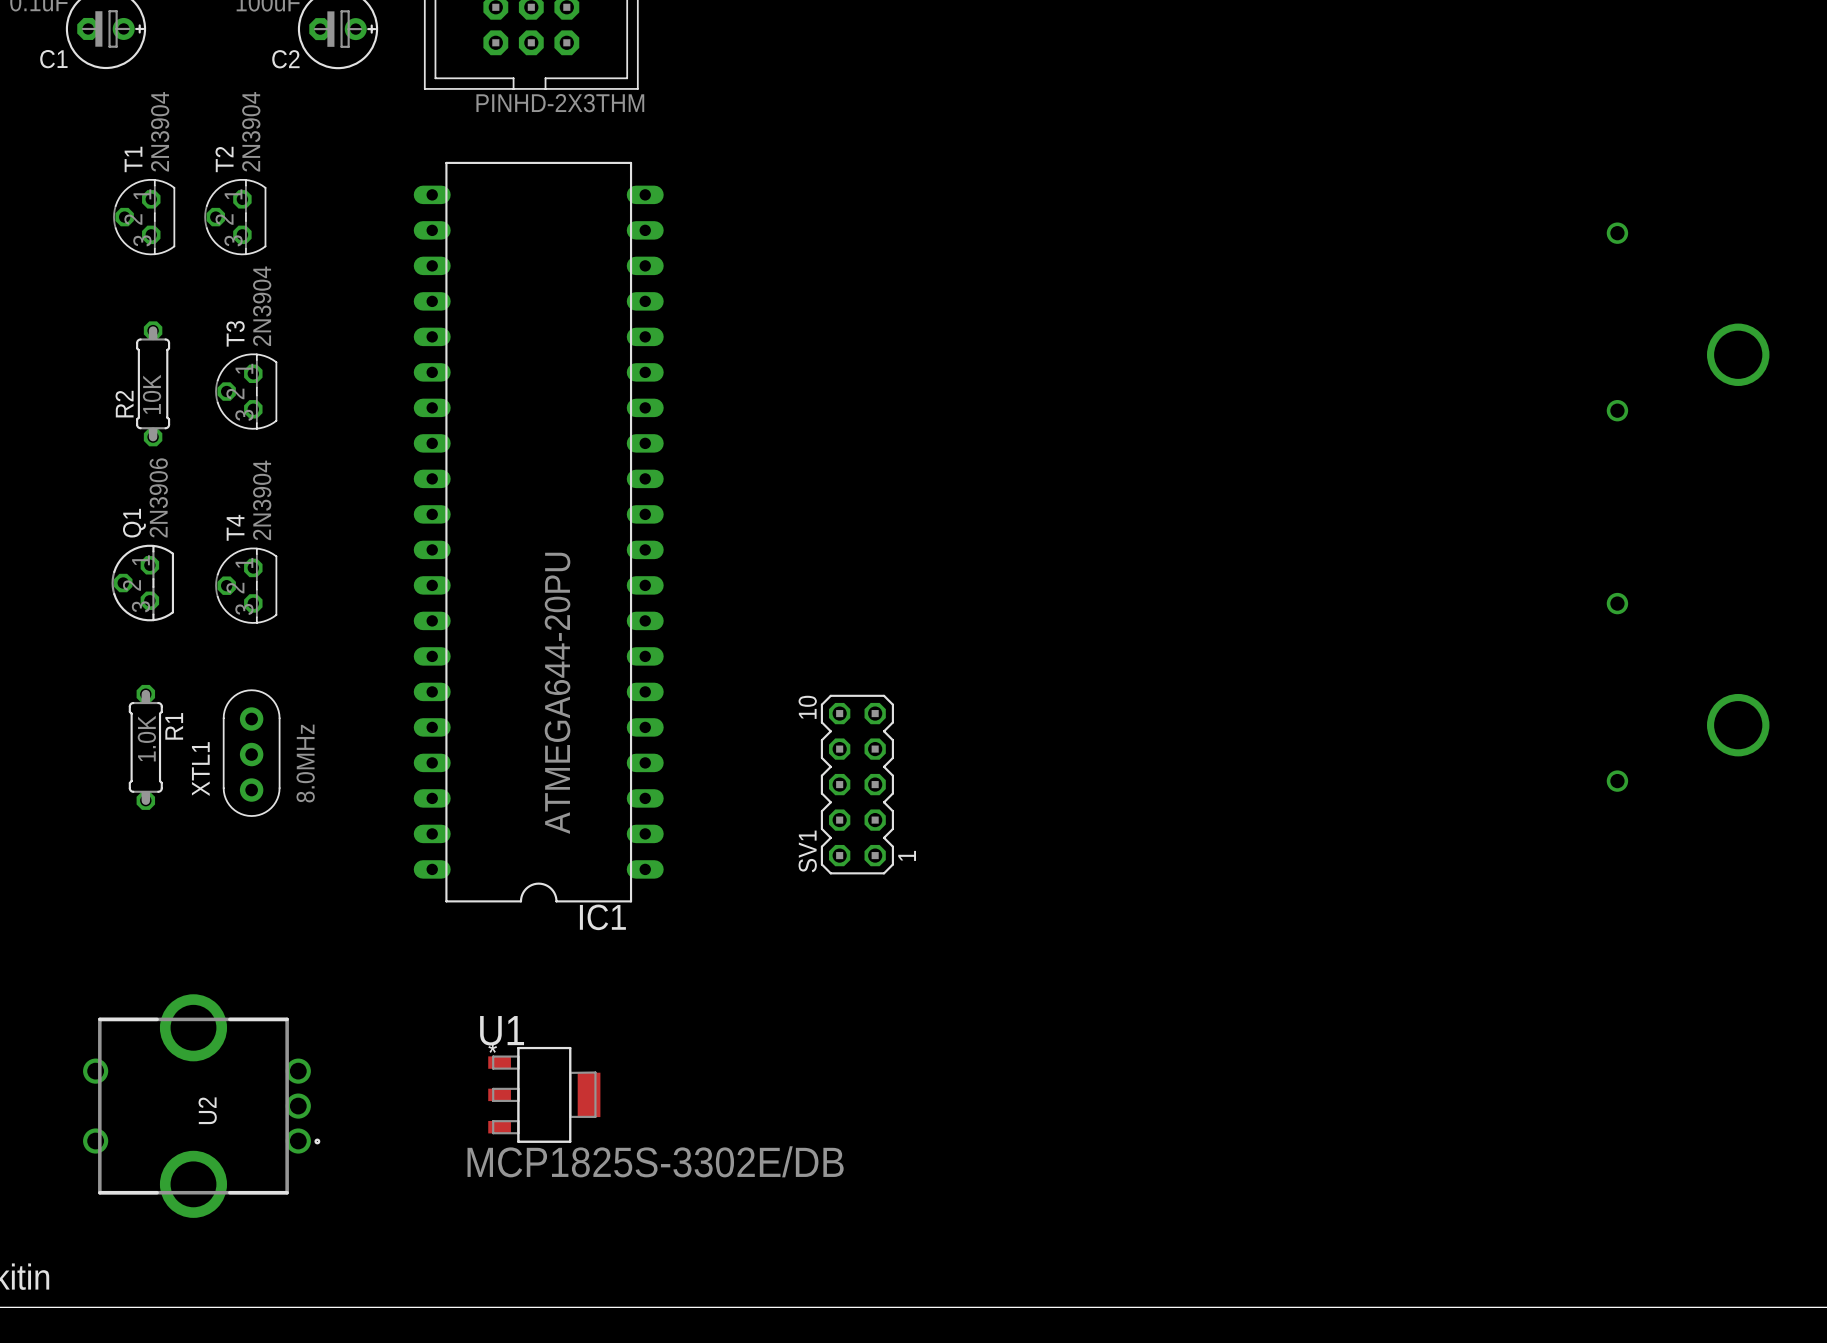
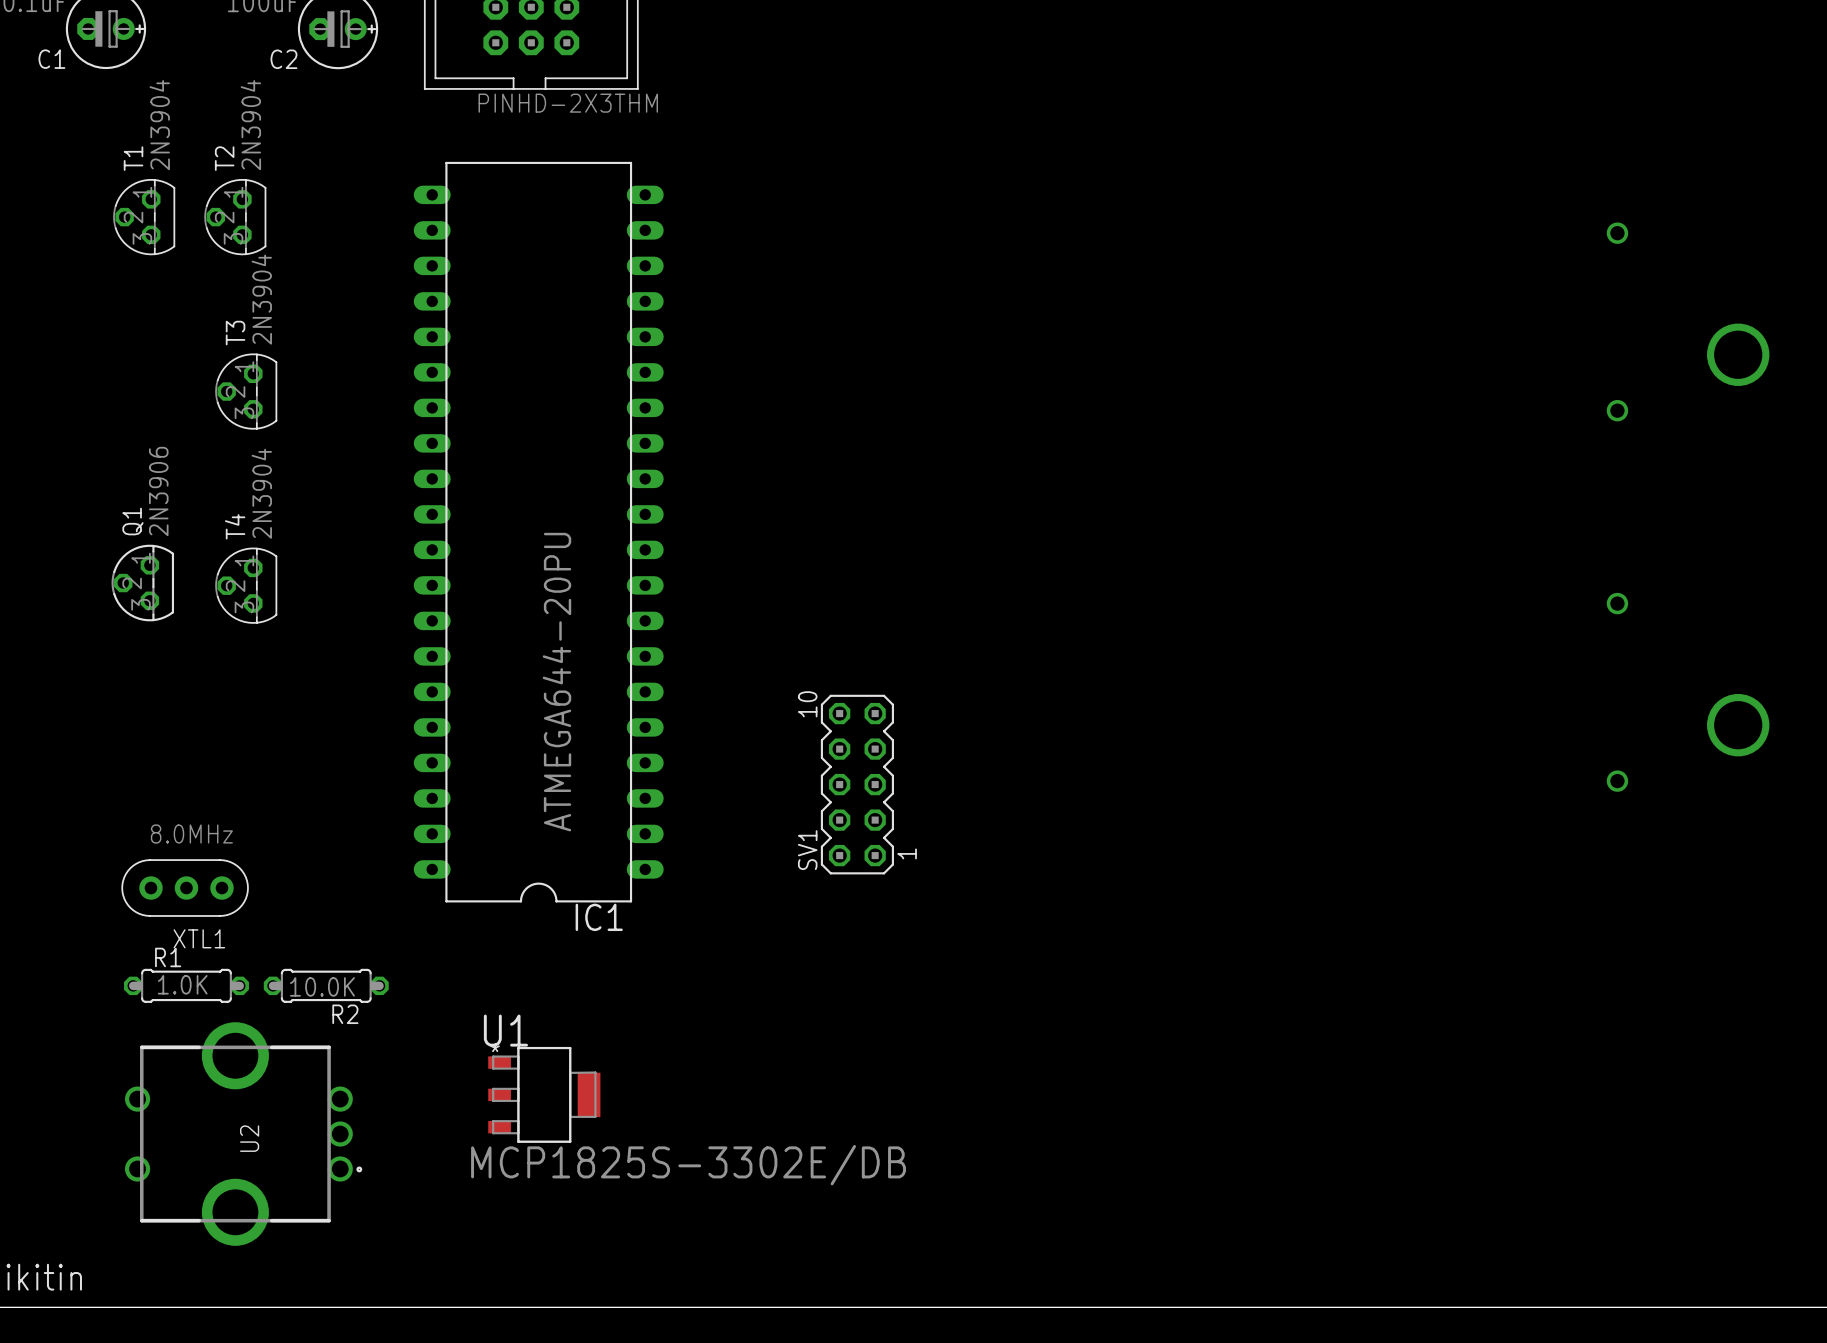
R2 rotation: 0° (153, 383) -> 90° clockwise (326, 985)
R2 position: (153, 383) -> (326, 985)
R2 value: 10K (152, 394) -> 10.0K (322, 986)
R2 name position: R2 (124, 404) -> R2 (345, 1014)
R1 name position: R1 (174, 726) -> R1 (168, 957)
R1 rotation: 0° (145, 747) -> 90° clockwise (186, 985)
R1 position: (145, 747) -> (186, 985)
XTL1 rotation: 0° (251, 753) -> 90° counterclockwise (185, 888)
XTL1 position: (251, 753) -> (185, 888)
U2 position: (201, 1106) -> (243, 1134)

